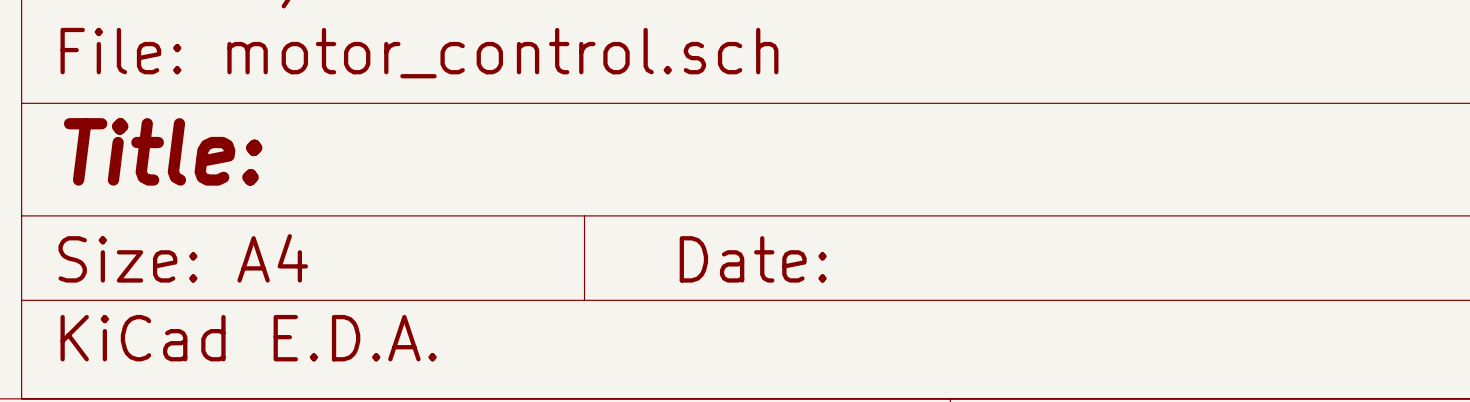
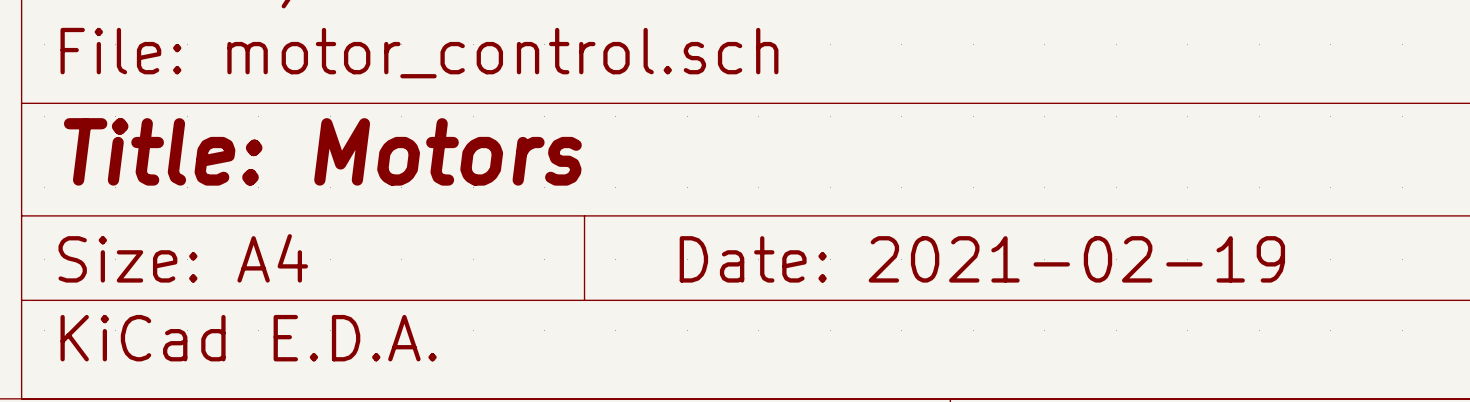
title block: Title: (163, 151) -> Title: Motors (322, 151)
title block: Date: (753, 259) -> Date: 2021-02-19 (982, 259)

